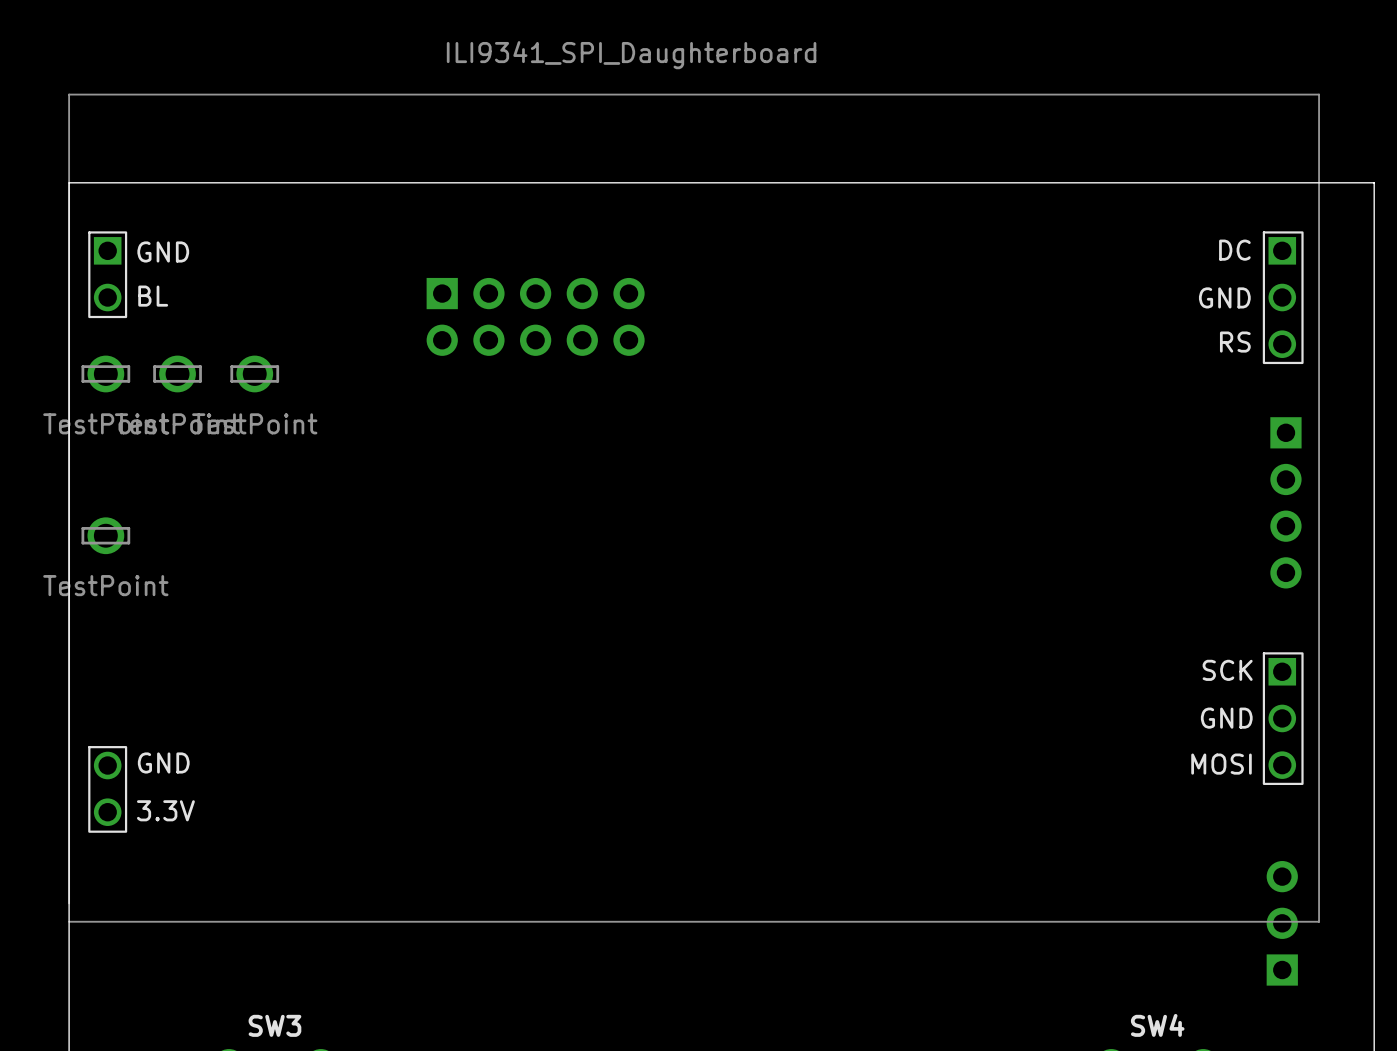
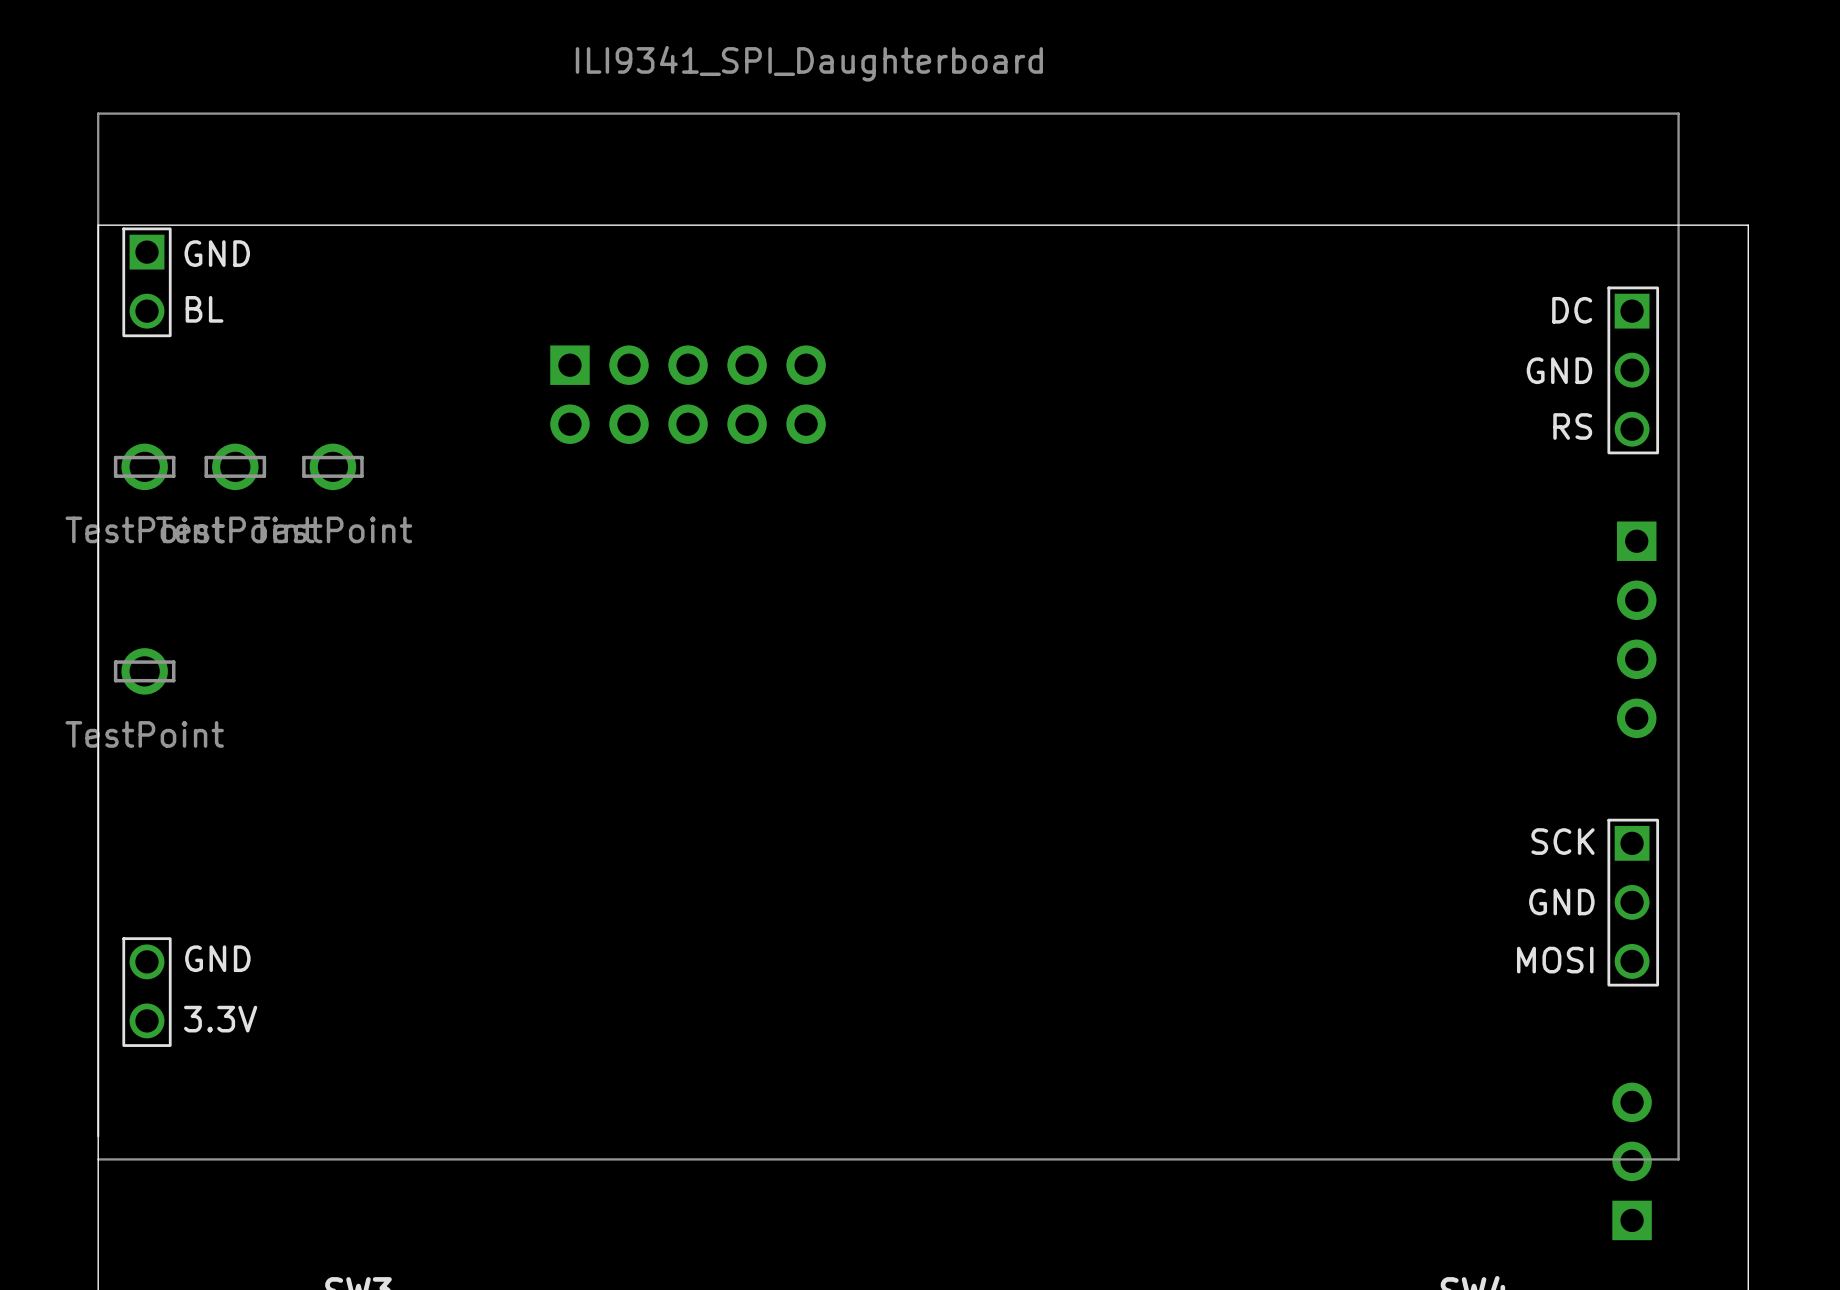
part footprint: [68, 93, 1320, 923] -> [97, 112, 1680, 1161]

